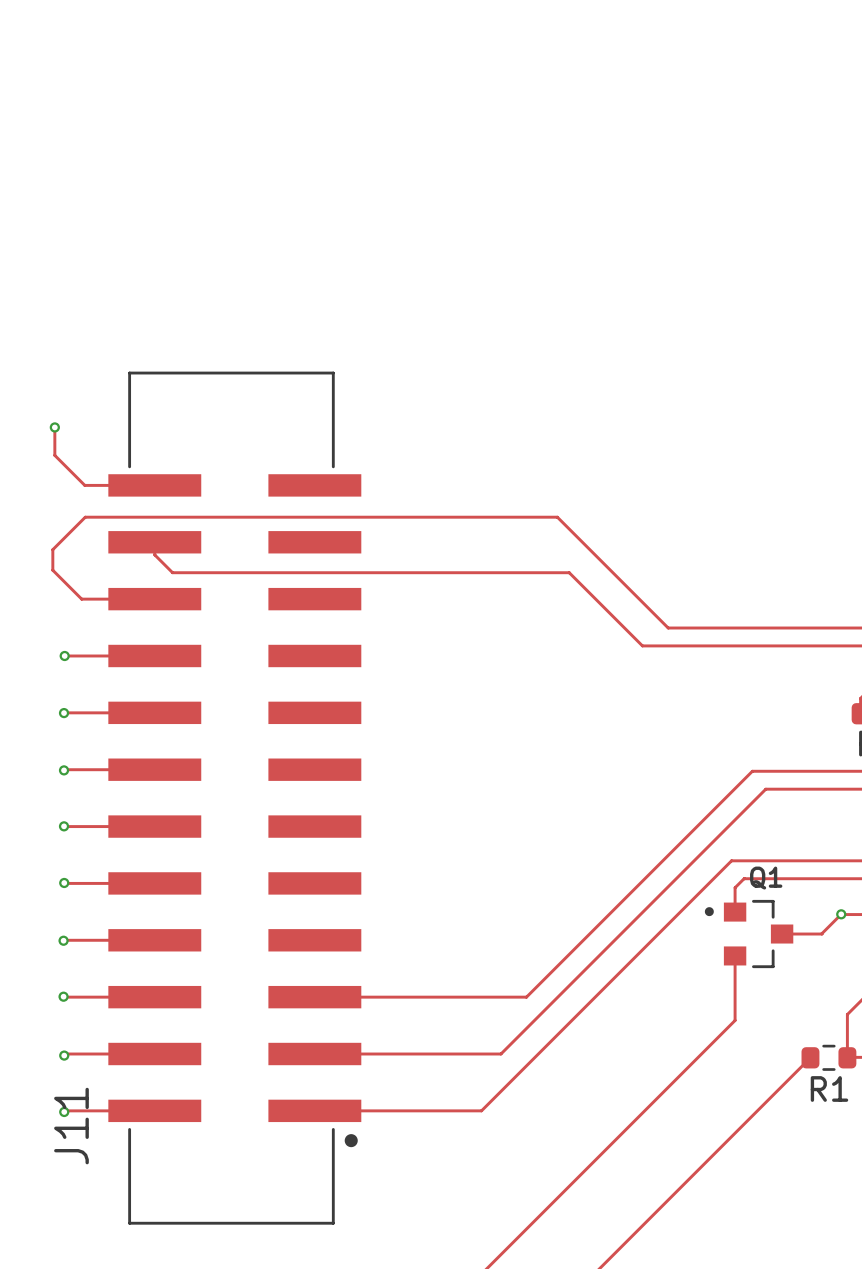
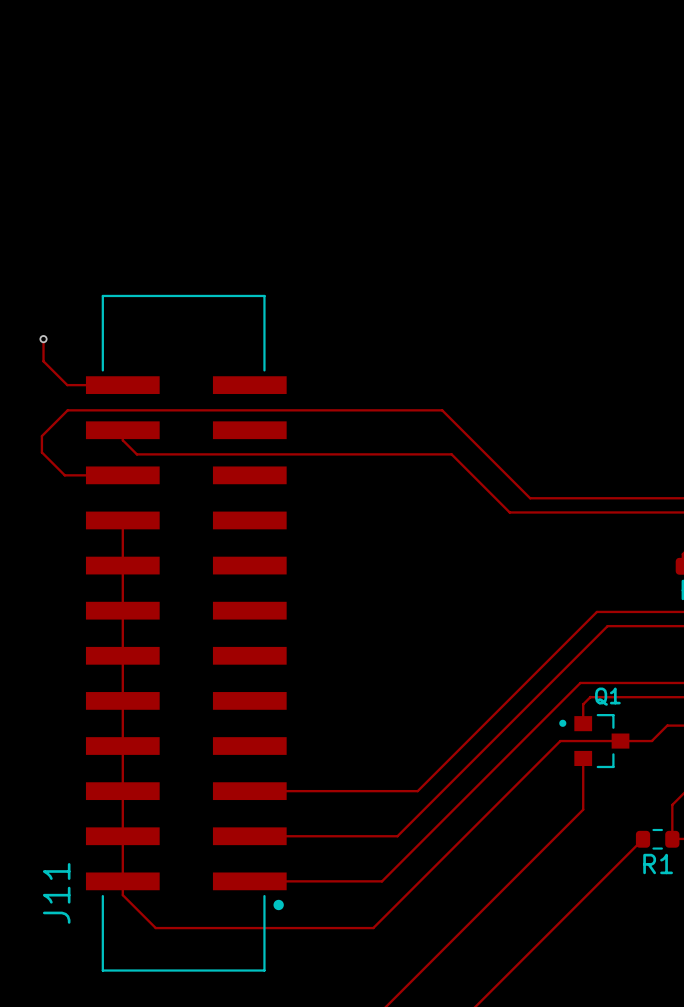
track: (64, 655) (154, 655) -> (620, 741) (560, 741) (373, 928) (155, 928) (122, 895) (122, 520)
via: (64, 655) -> none
track: (64, 712) (154, 712) -> none
via: (64, 713) -> none
track: (64, 769) (154, 769) -> none
via: (64, 770) -> none
track: (64, 826) (154, 826) -> none
via: (64, 826) -> none
via: (64, 882) -> none
track: (64, 883) (154, 883) -> none
via: (841, 914) -> none
via: (63, 940) -> none
track: (64, 940) (154, 940) -> none
via: (63, 996) -> none
track: (64, 997) (154, 997) -> none
track: (65, 1054) (154, 1054) -> none
via: (64, 1055) -> none
track: (65, 1110) (154, 1110) -> none
via: (64, 1111) -> none

